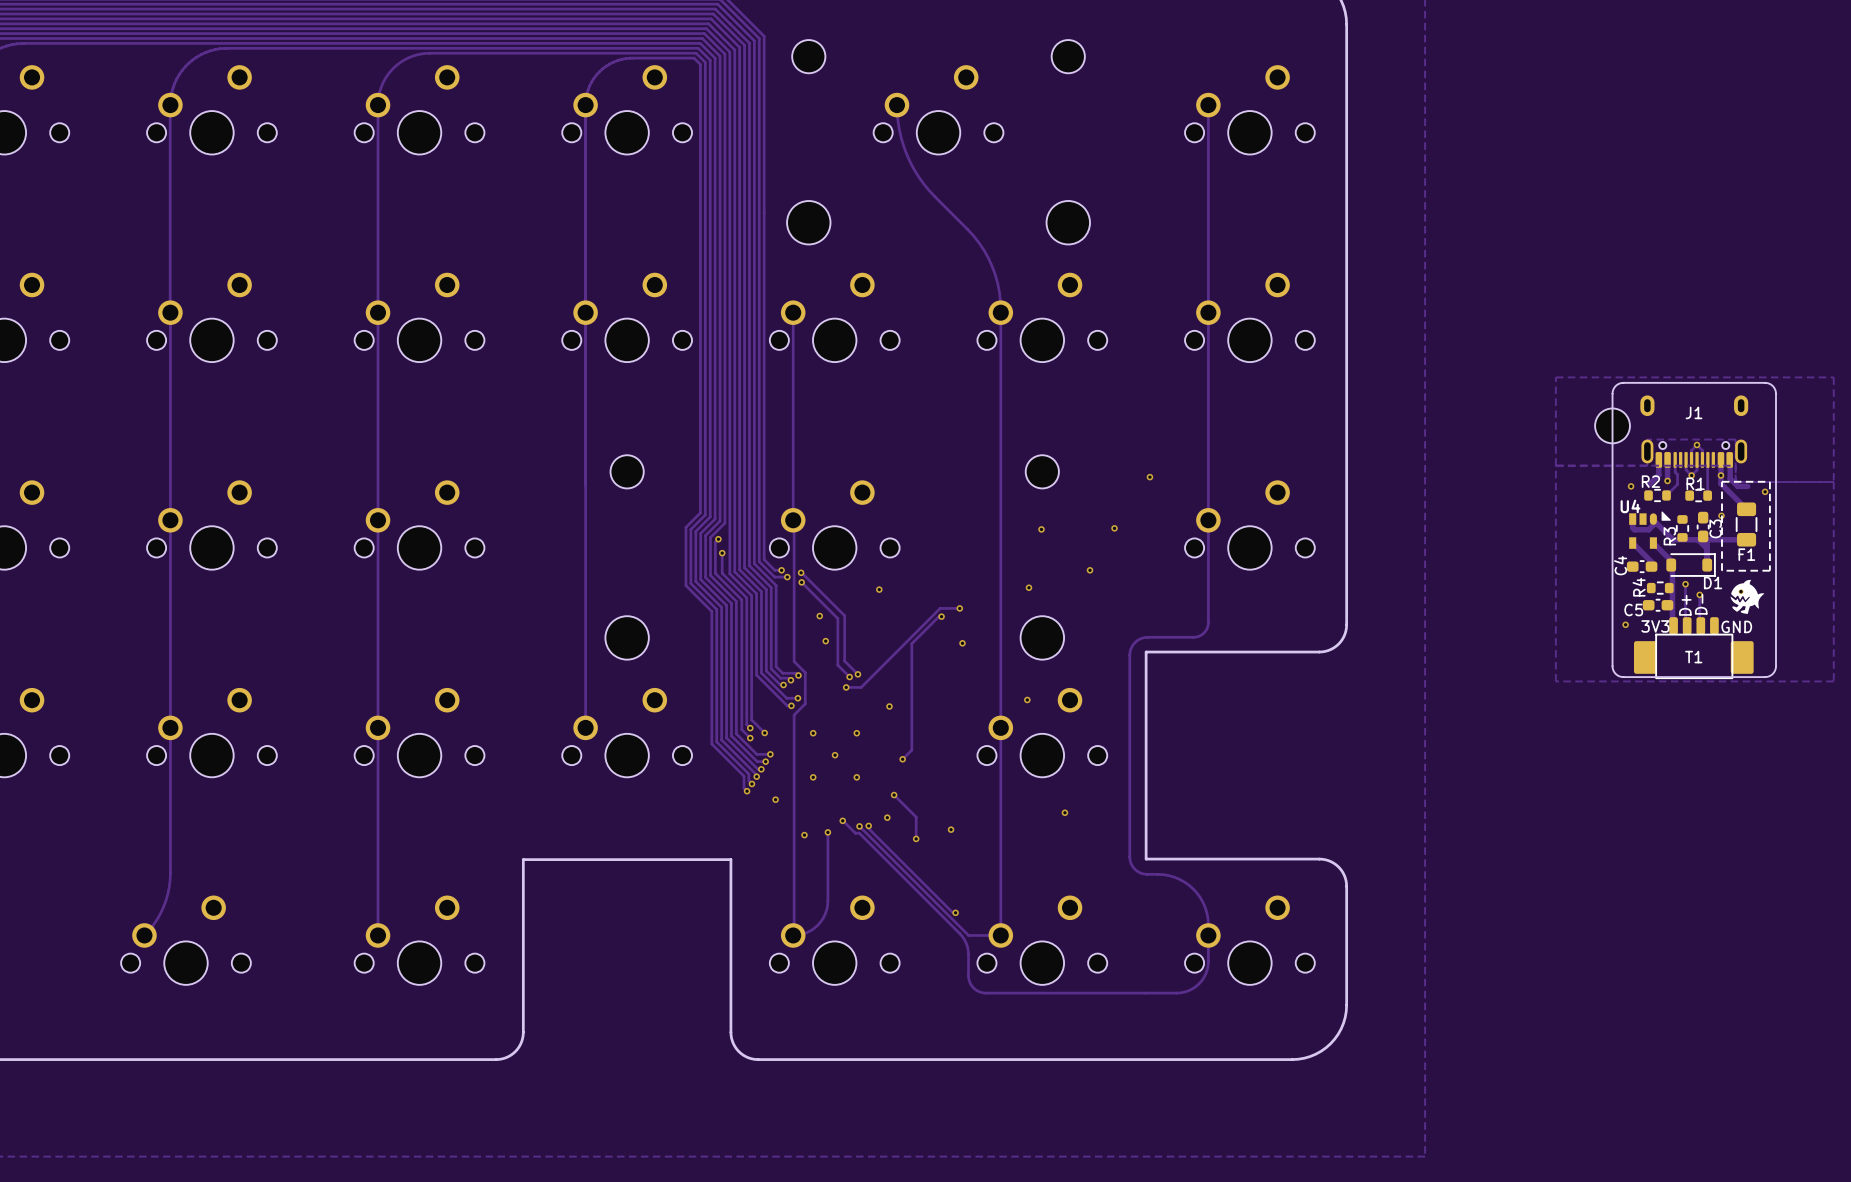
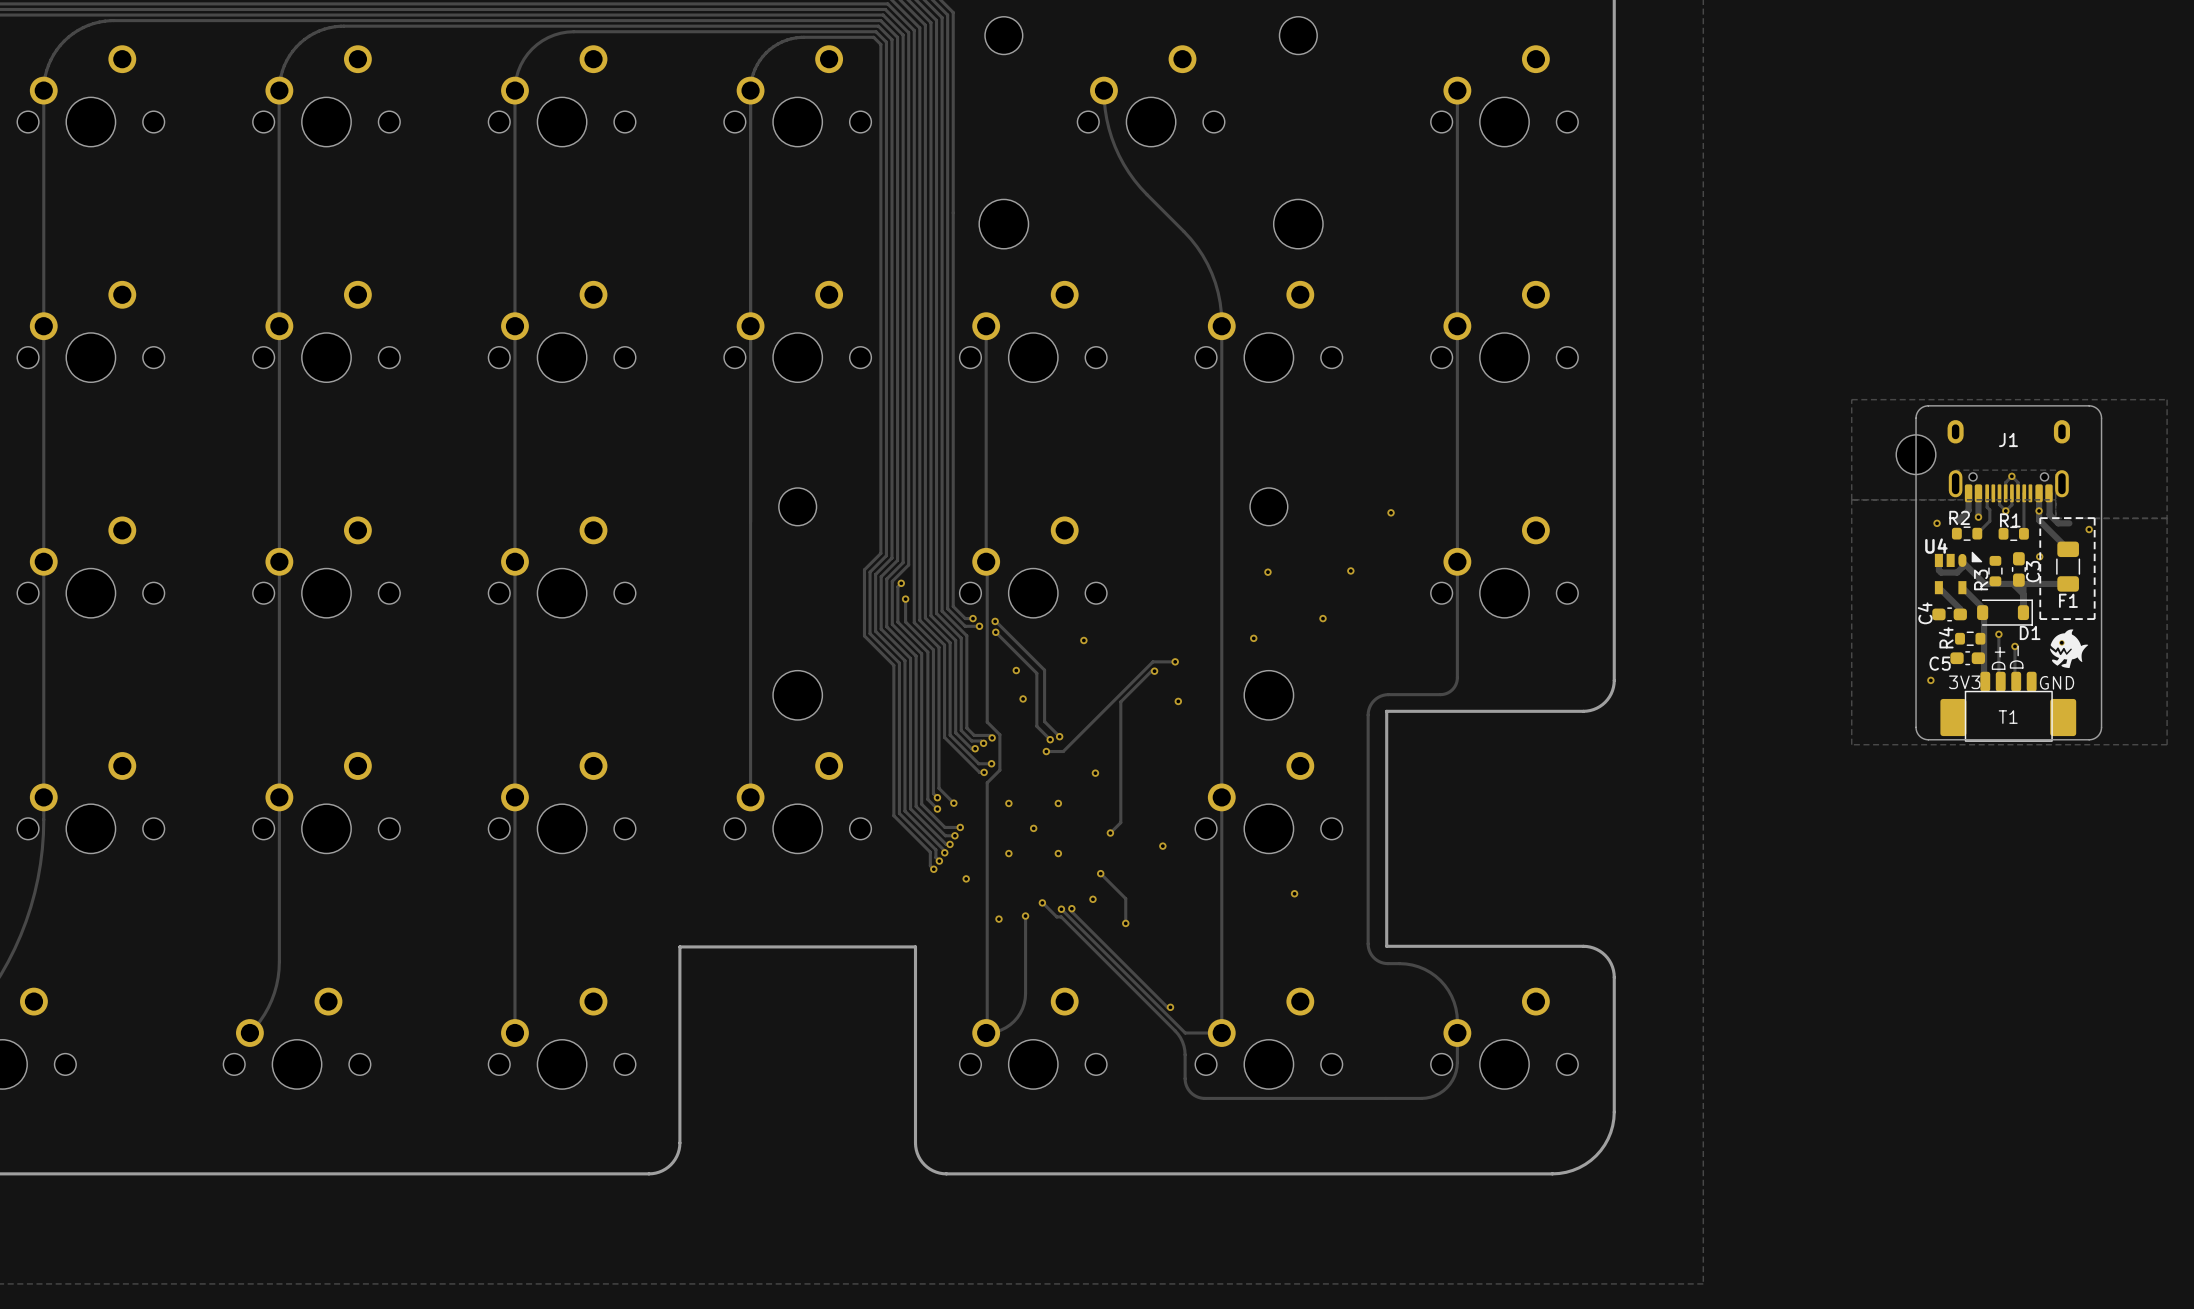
via: (1027, 699) -> none
via: none -> (1162, 846)
via: (951, 829) -> none

